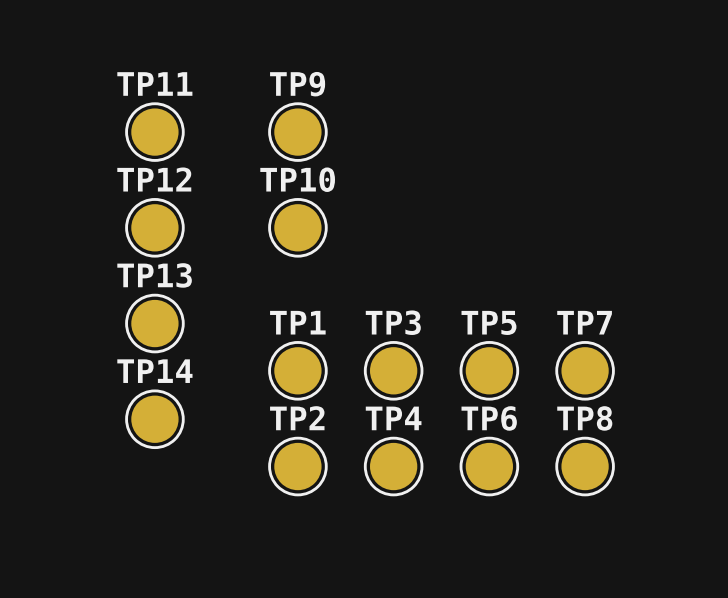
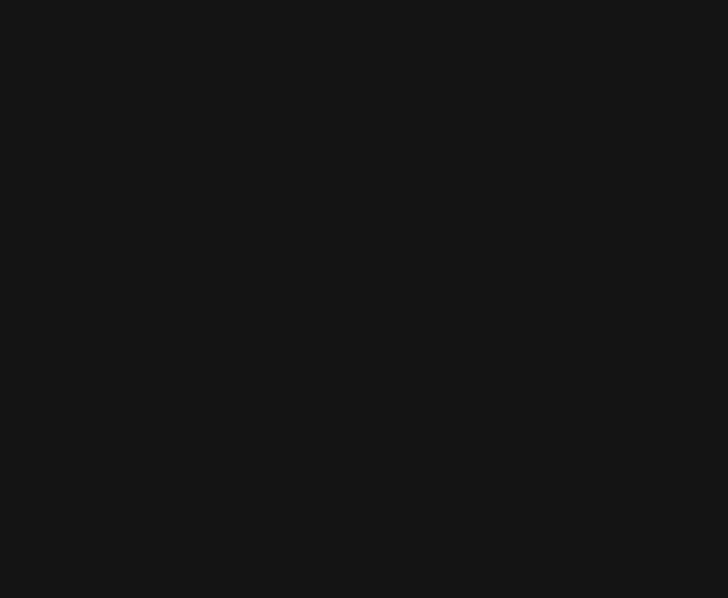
TP11: (154, 132) -> none
TP9: (297, 132) -> none
TP12: (154, 227) -> none
TP10: (297, 227) -> none
TP13: (154, 323) -> none
TP1: (297, 370) -> none
TP3: (393, 370) -> none
TP5: (489, 370) -> none
TP7: (585, 370) -> none
TP14: (154, 419) -> none
TP2: (297, 466) -> none
TP4: (393, 466) -> none
TP6: (489, 466) -> none
TP8: (585, 466) -> none

